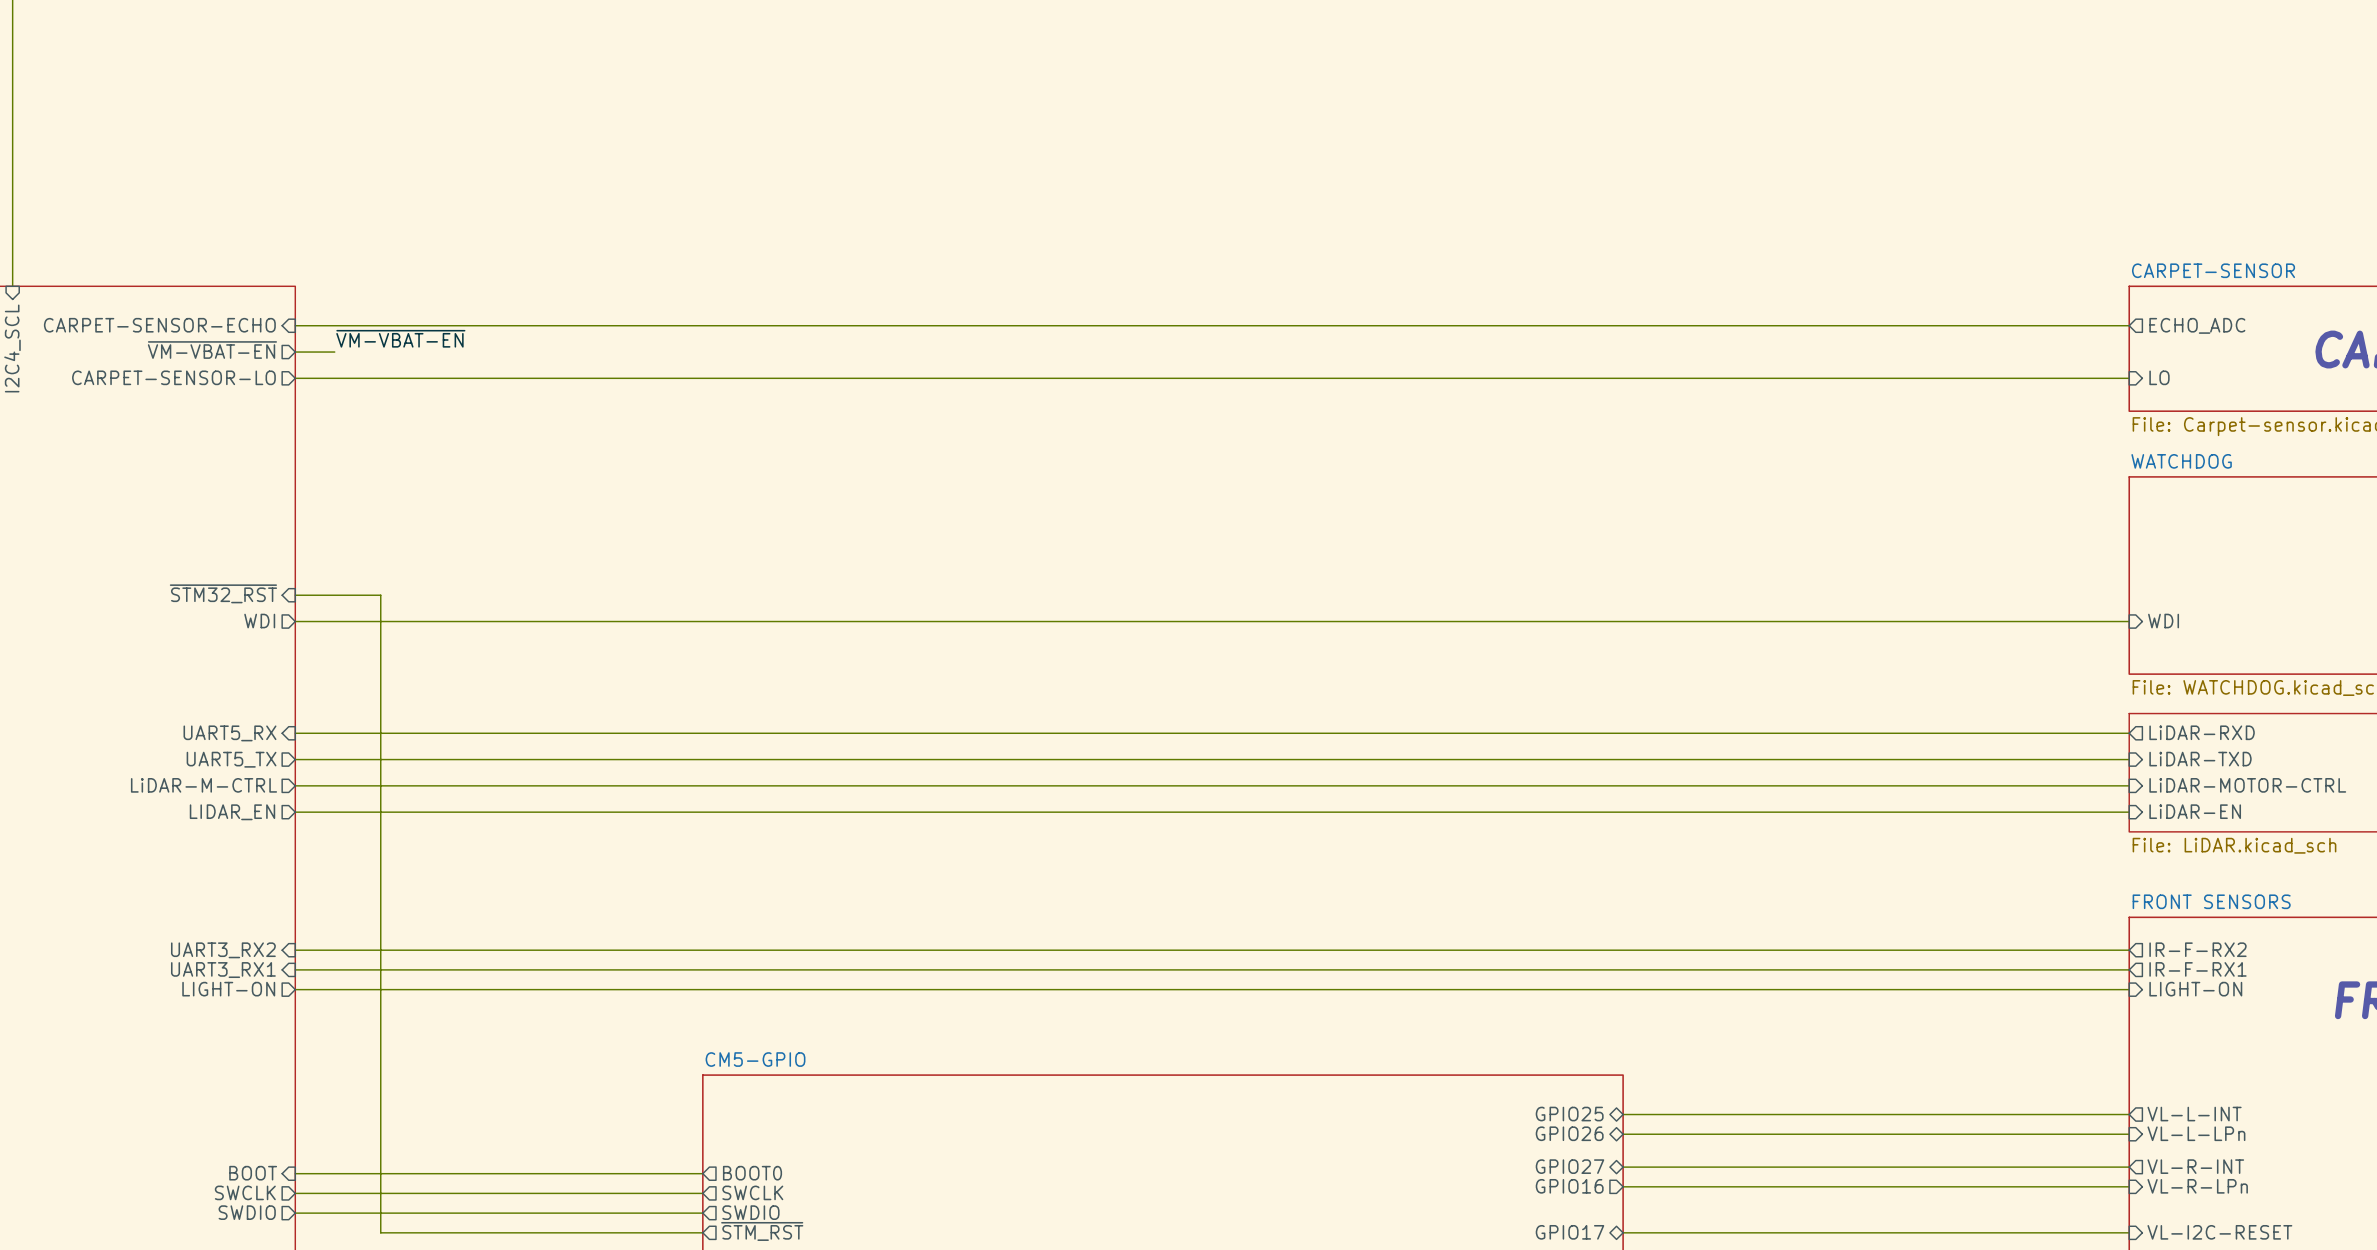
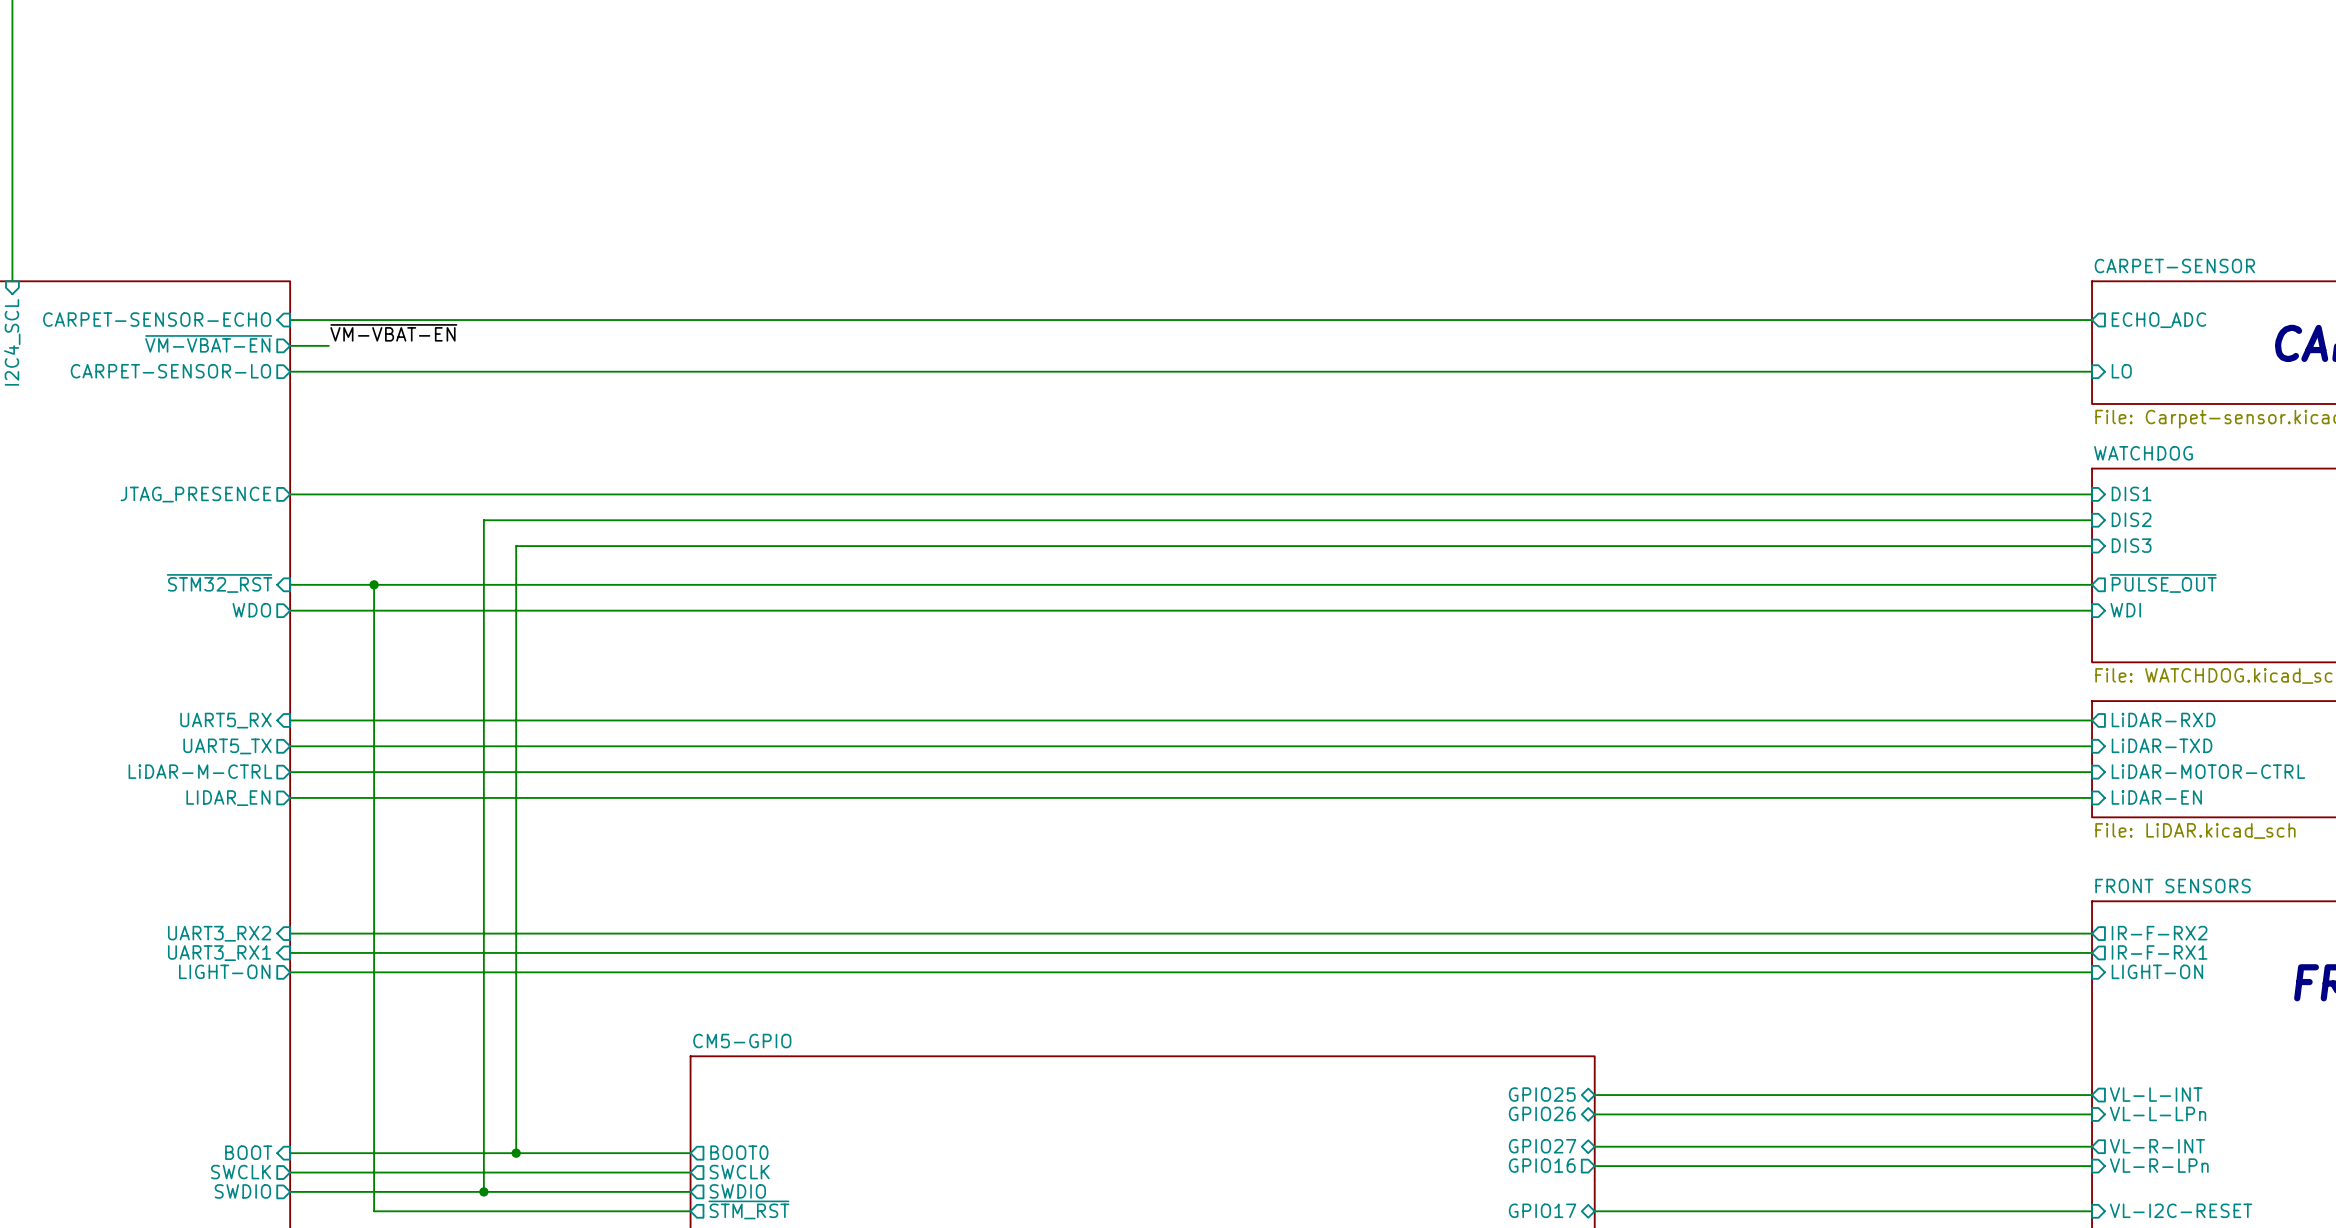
sheet pin: none -> DIS1 (2131, 493)
sheet pin: none -> JTAG_PRESENCE (195, 494)
wire: none -> (290, 494) (2092, 494)
wire: none -> (2092, 520) (483, 520) (483, 1191)
sheet pin: none -> DIS2 (2131, 519)
wire: none -> (2092, 546) (516, 546) (516, 1153)
sheet pin: none -> DIS3 (2131, 545)
sheet pin: none -> ~{PULSE_OUT} (2163, 583)
wire: none -> (374, 584) (2092, 584)
junction: none -> (374, 584)
sheet pin: WDI (259, 621) -> WDO (251, 610)
junction: none -> (516, 1153)
junction: none -> (483, 1191)

